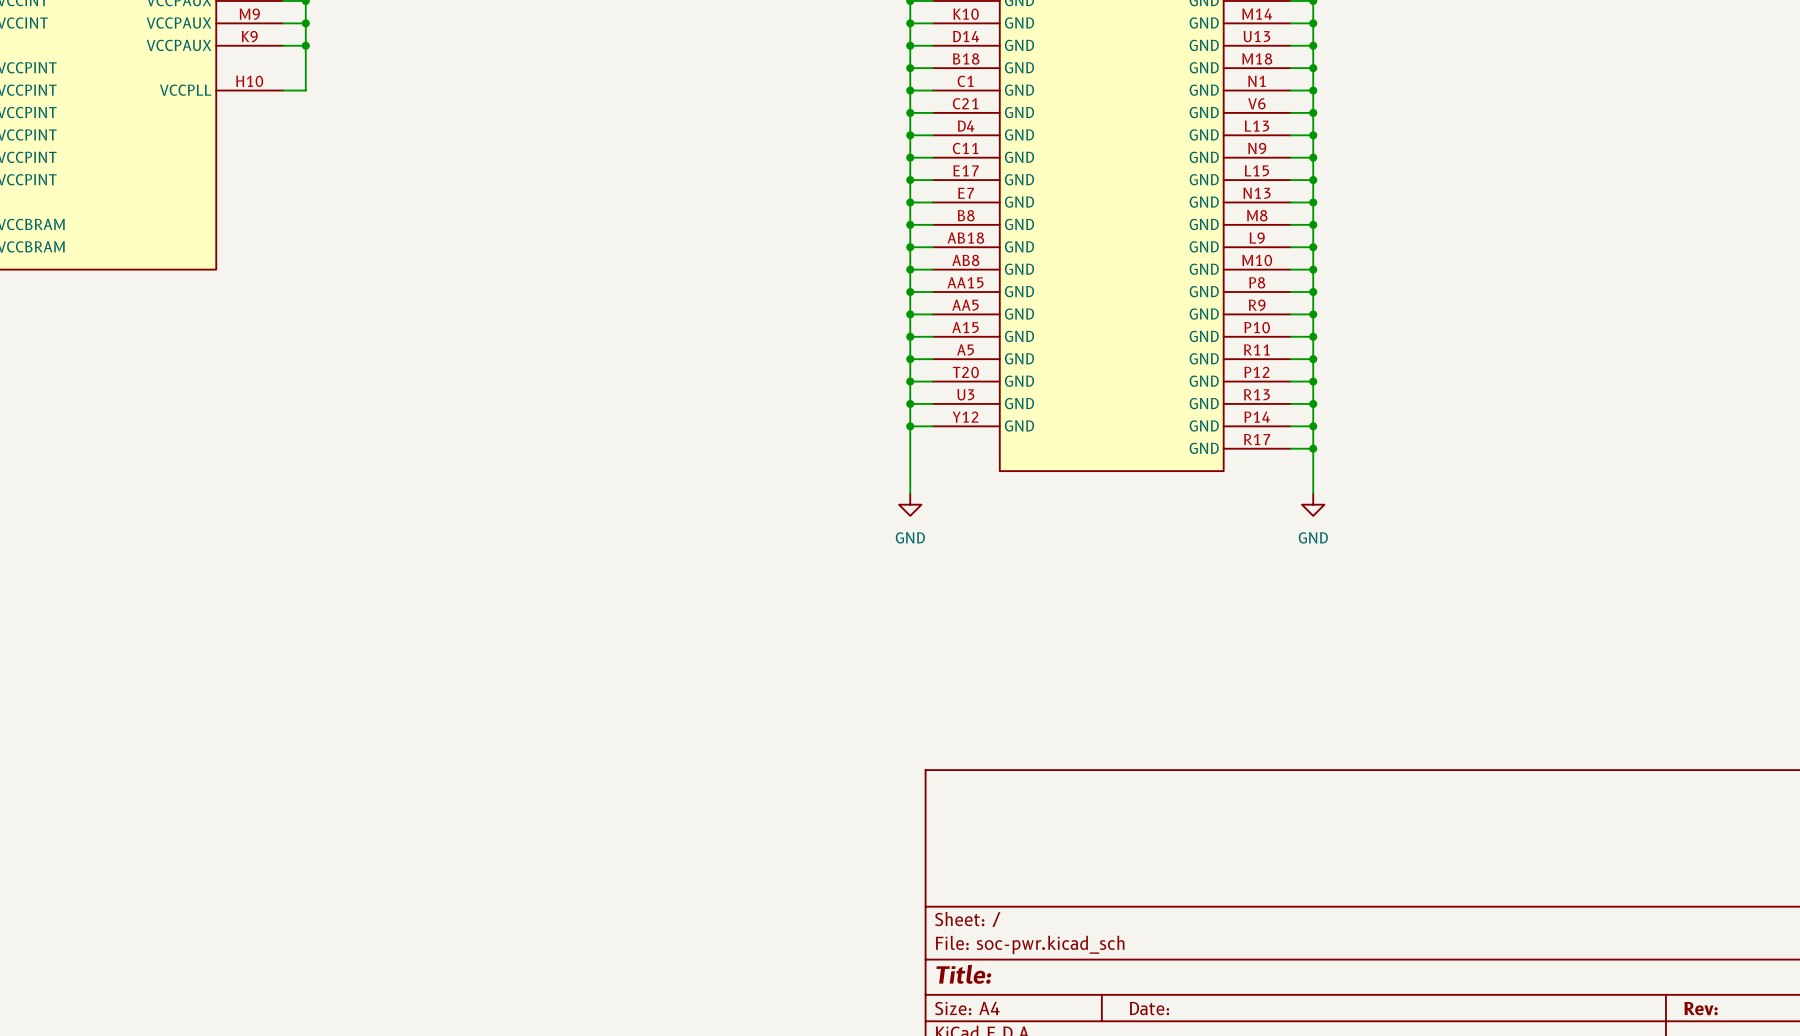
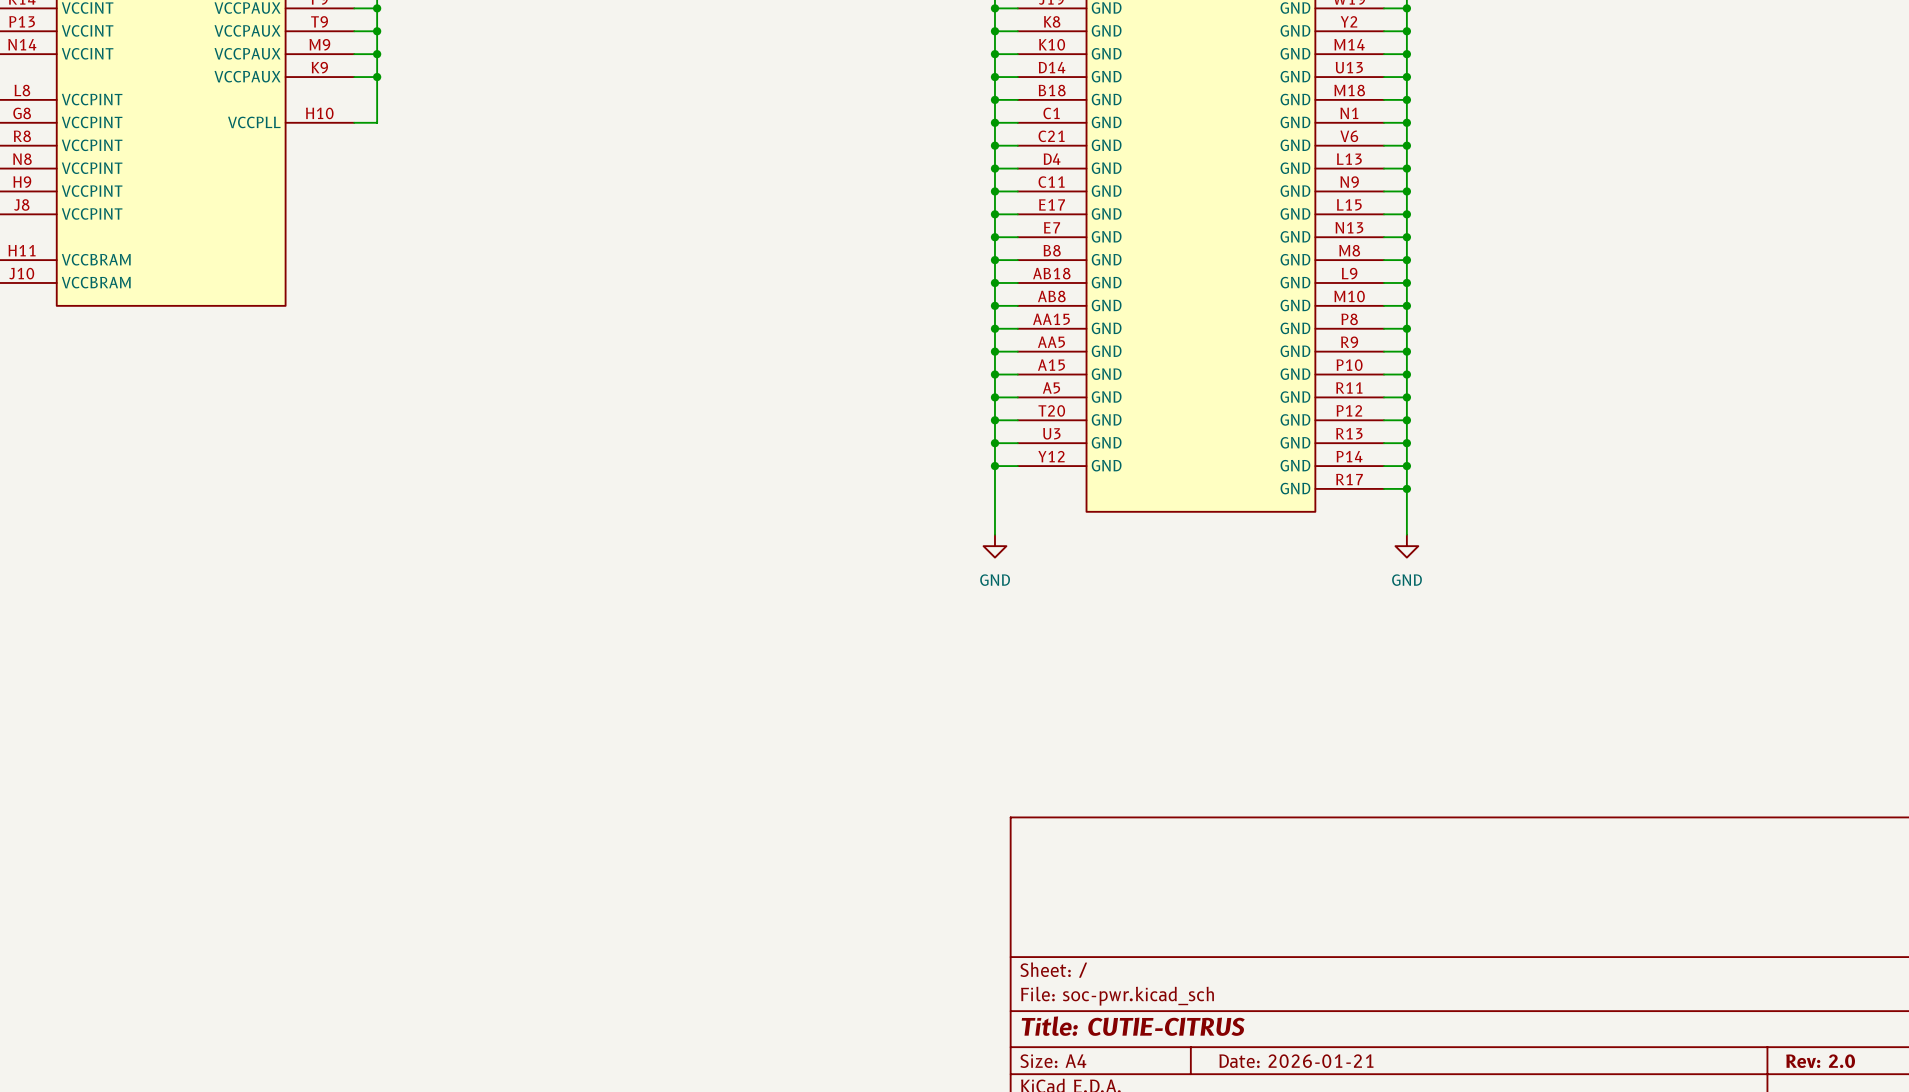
title block: Title: (963, 974) -> Title: CUTIE-CITRUS (1133, 1026)
title block: Date: (1149, 1008) -> Date: 2026-01-21 (1296, 1061)
title block: Rev: (1700, 1008) -> Rev: 2.0 (1820, 1061)

